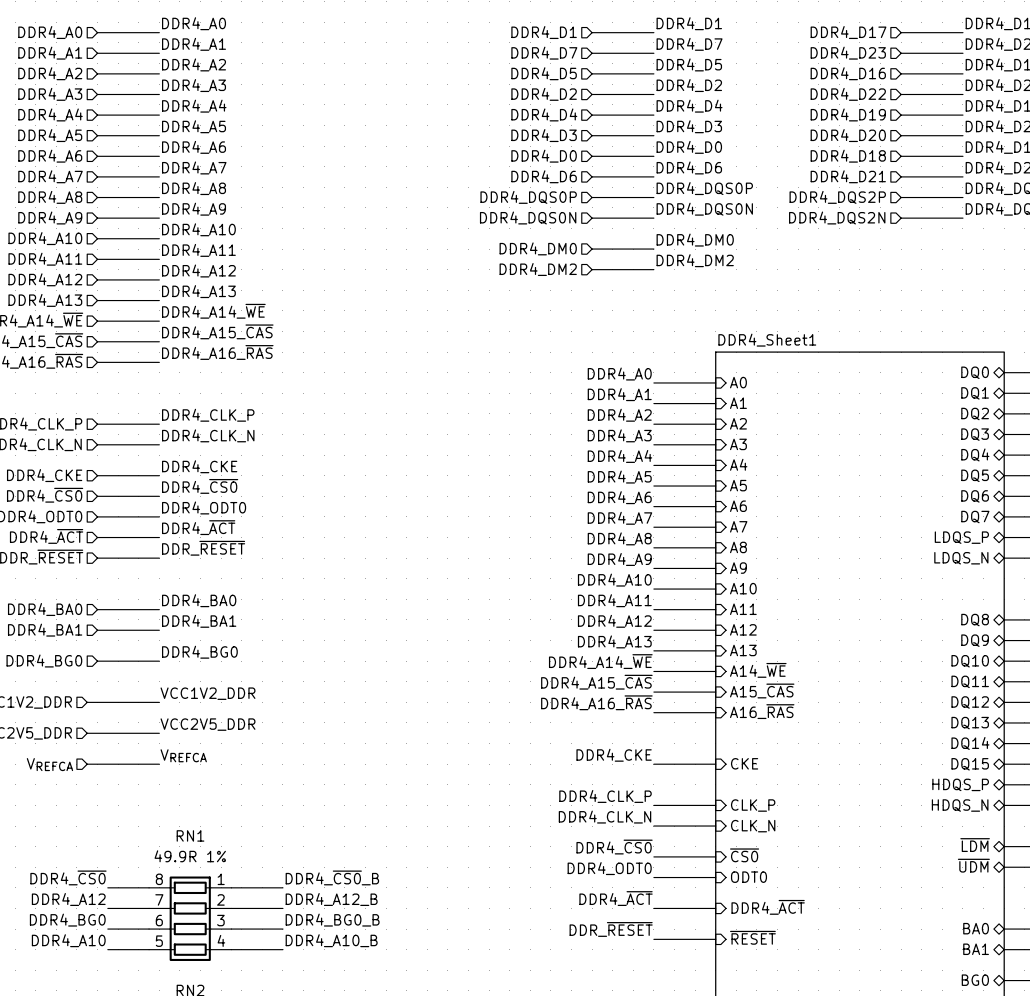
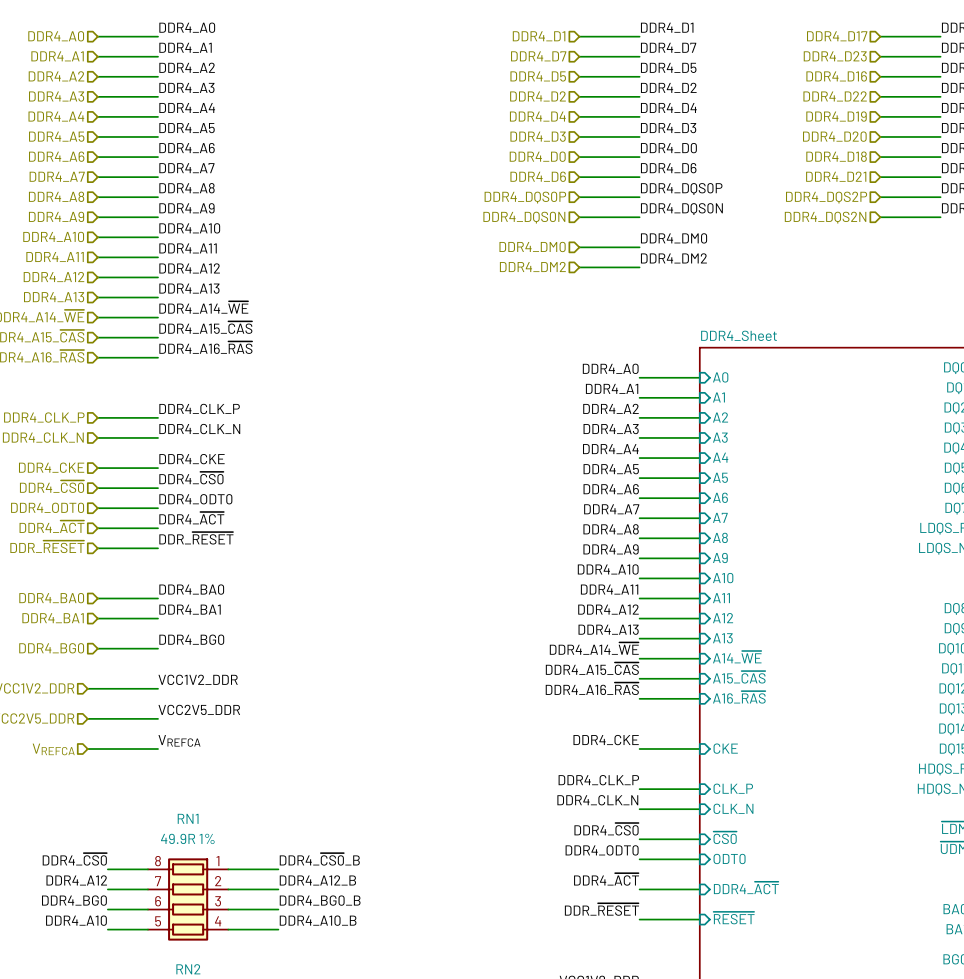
sheet DDR4_Sheet1 name: DDR4_Sheet1 (767, 340) -> DDR4_Sheet (739, 335)

